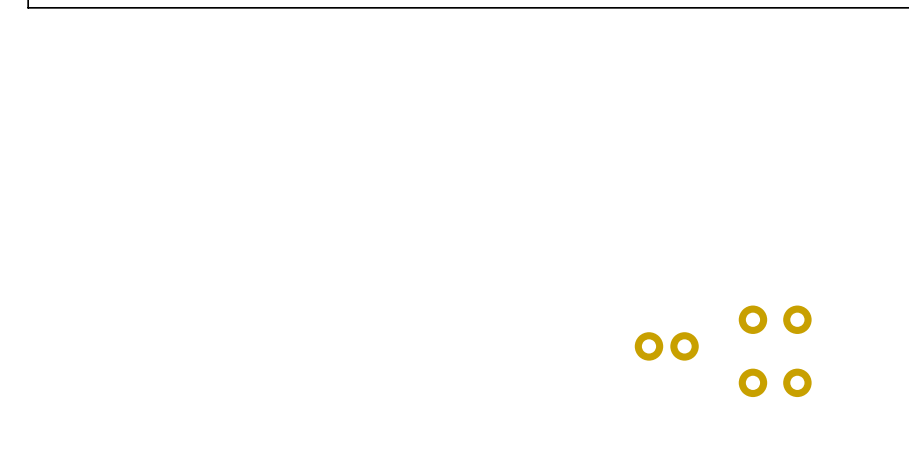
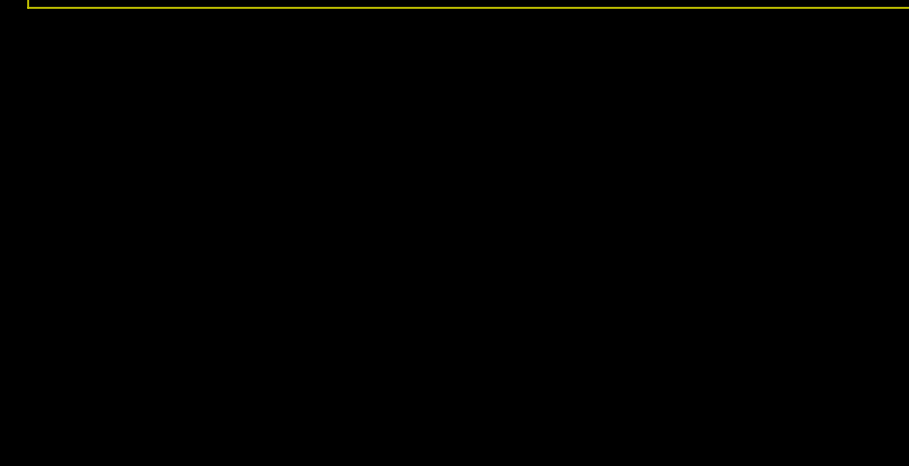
part: (775, 319) -> none
part: (666, 346) -> none
part: (775, 382) -> none

